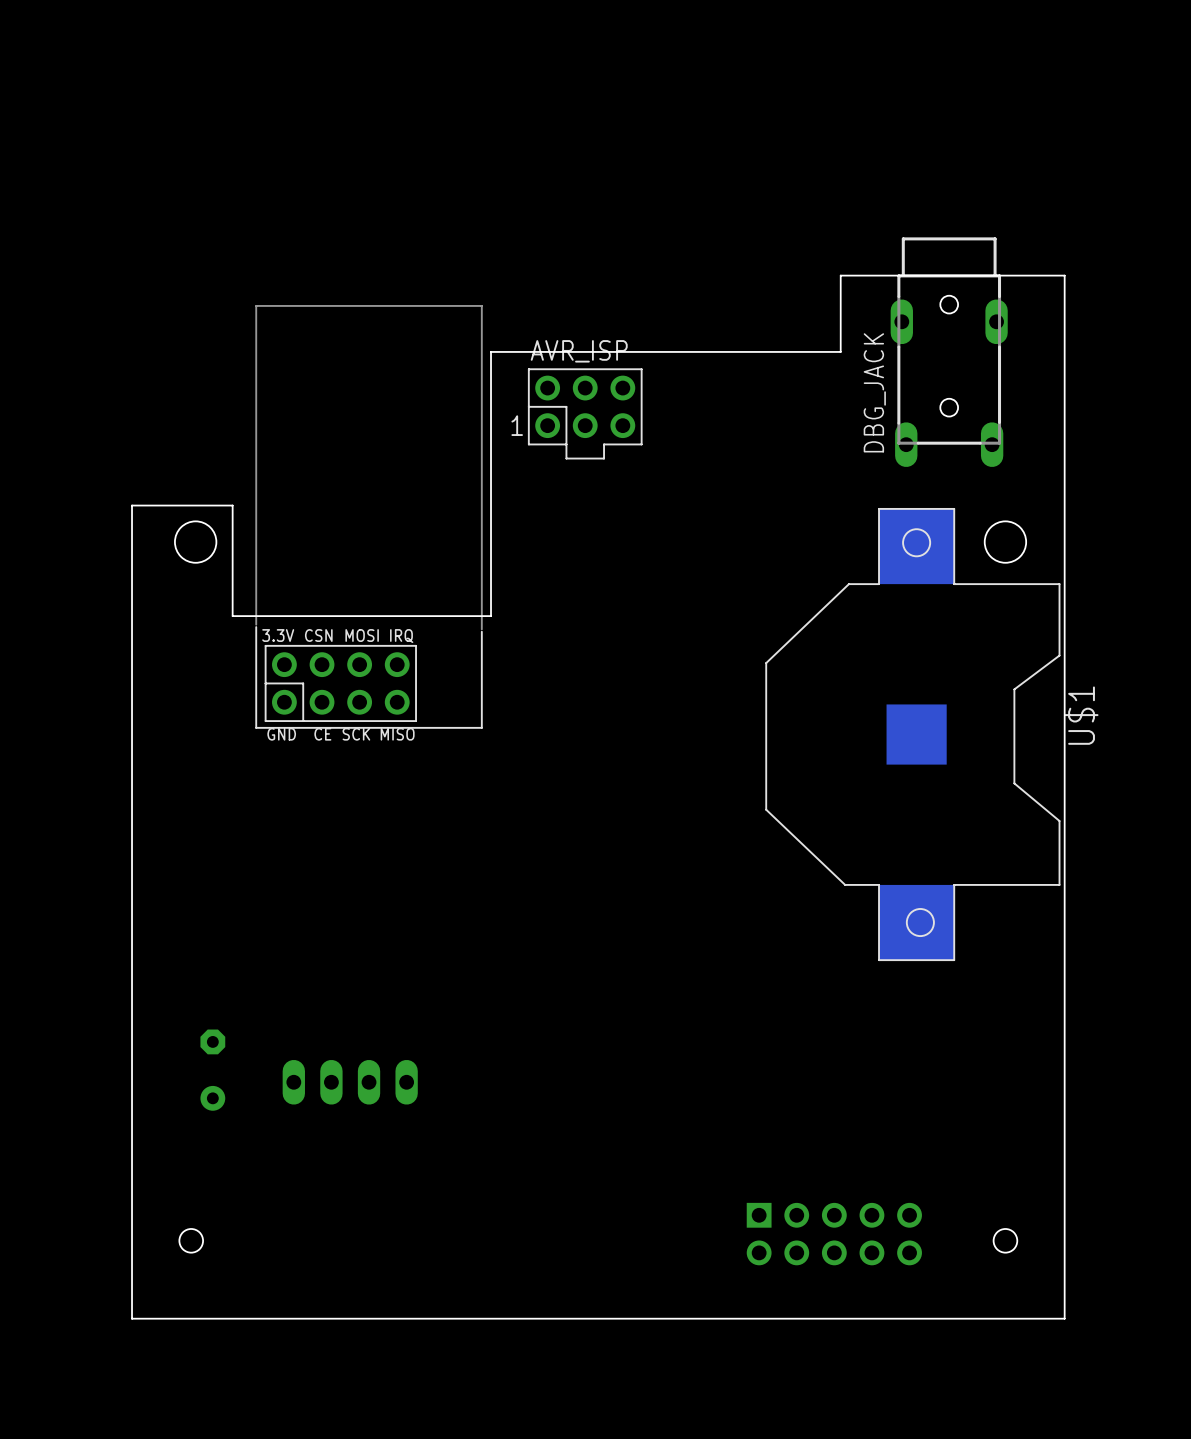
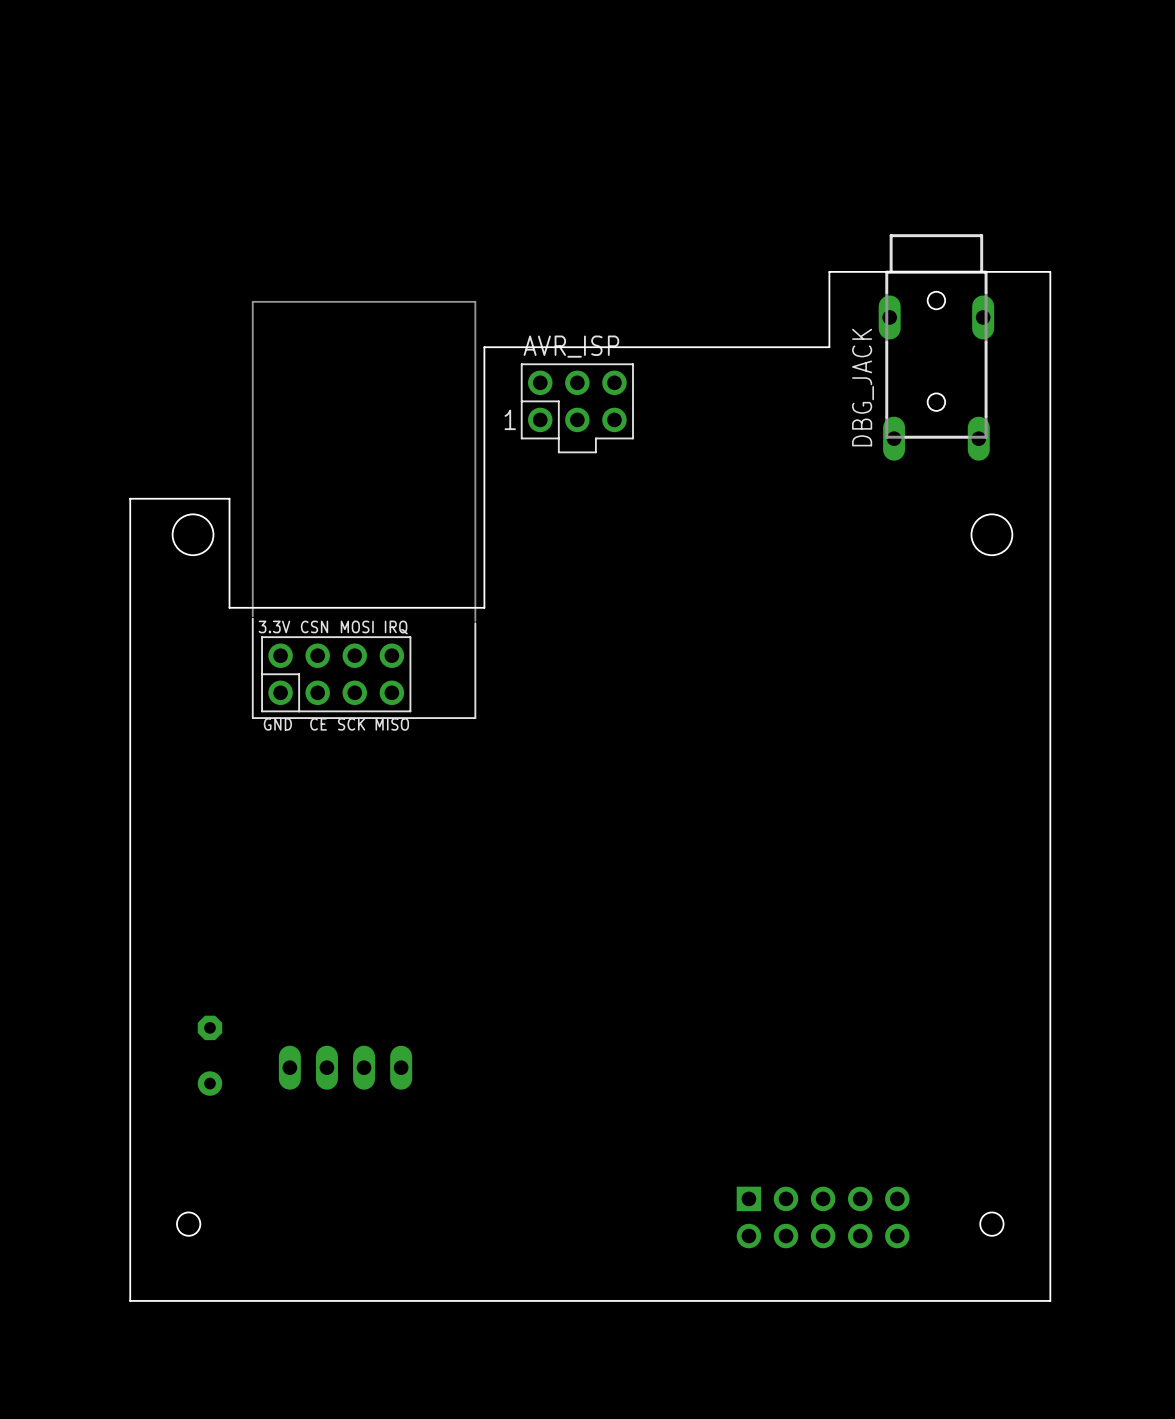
U$1: (912, 734) -> none

